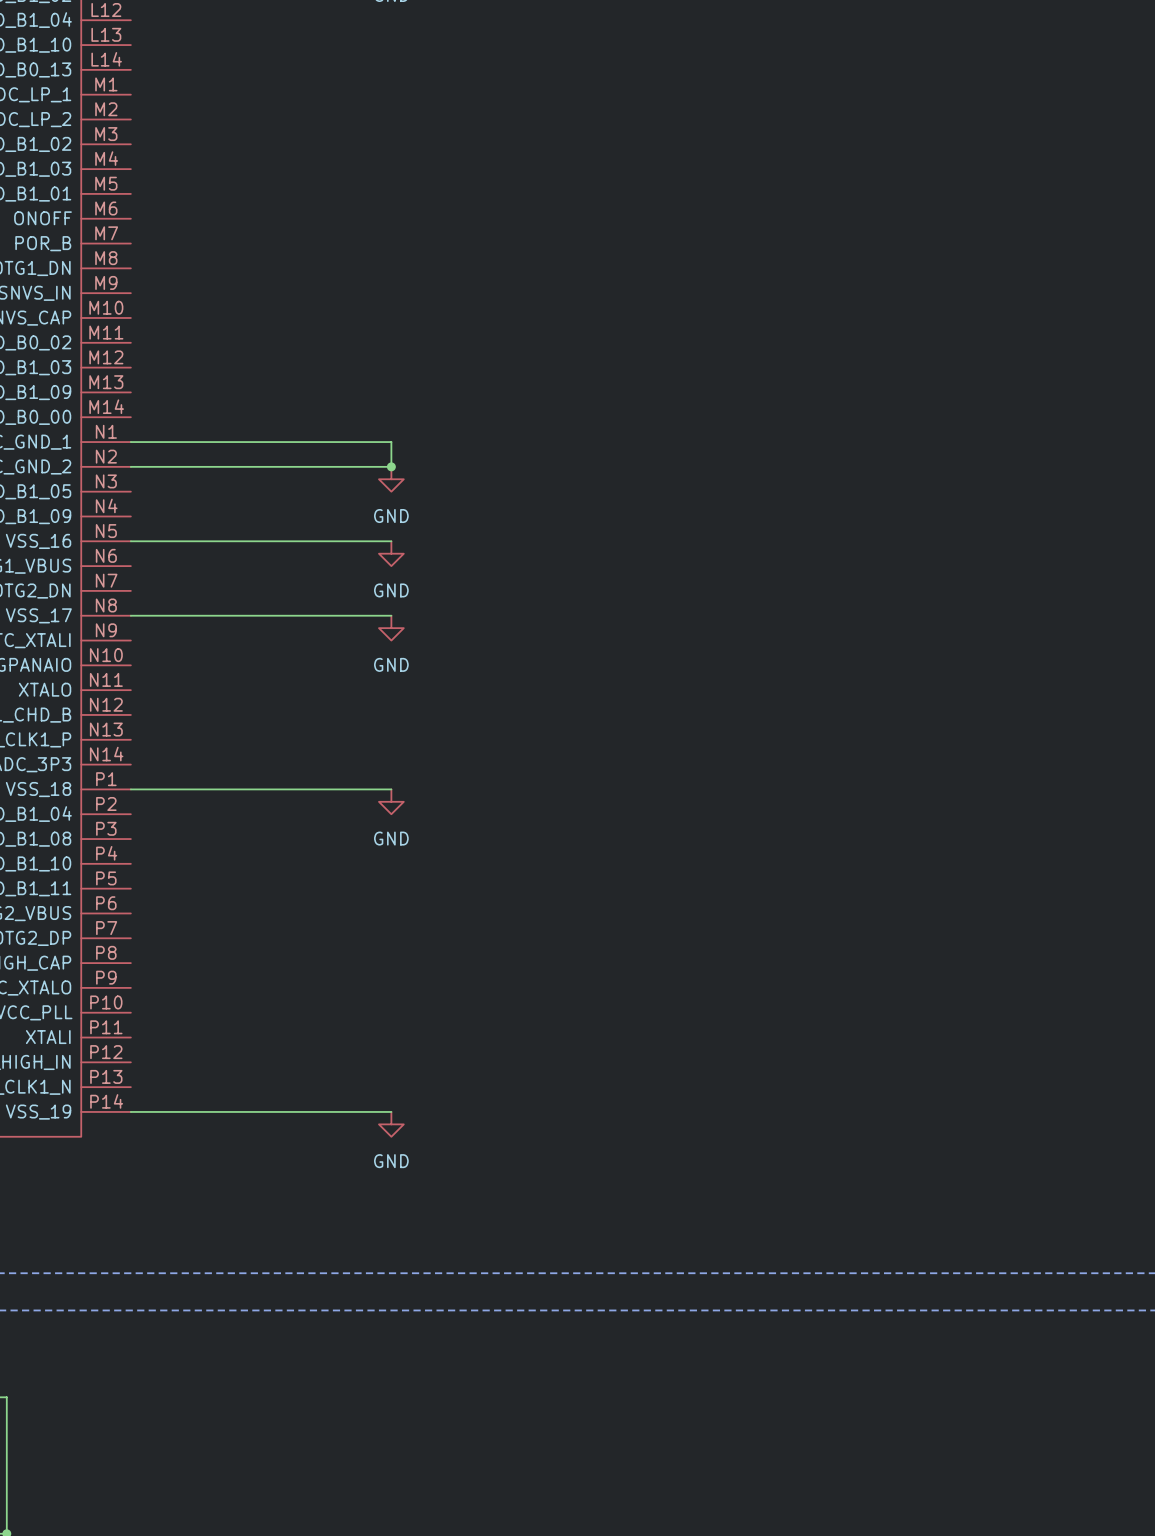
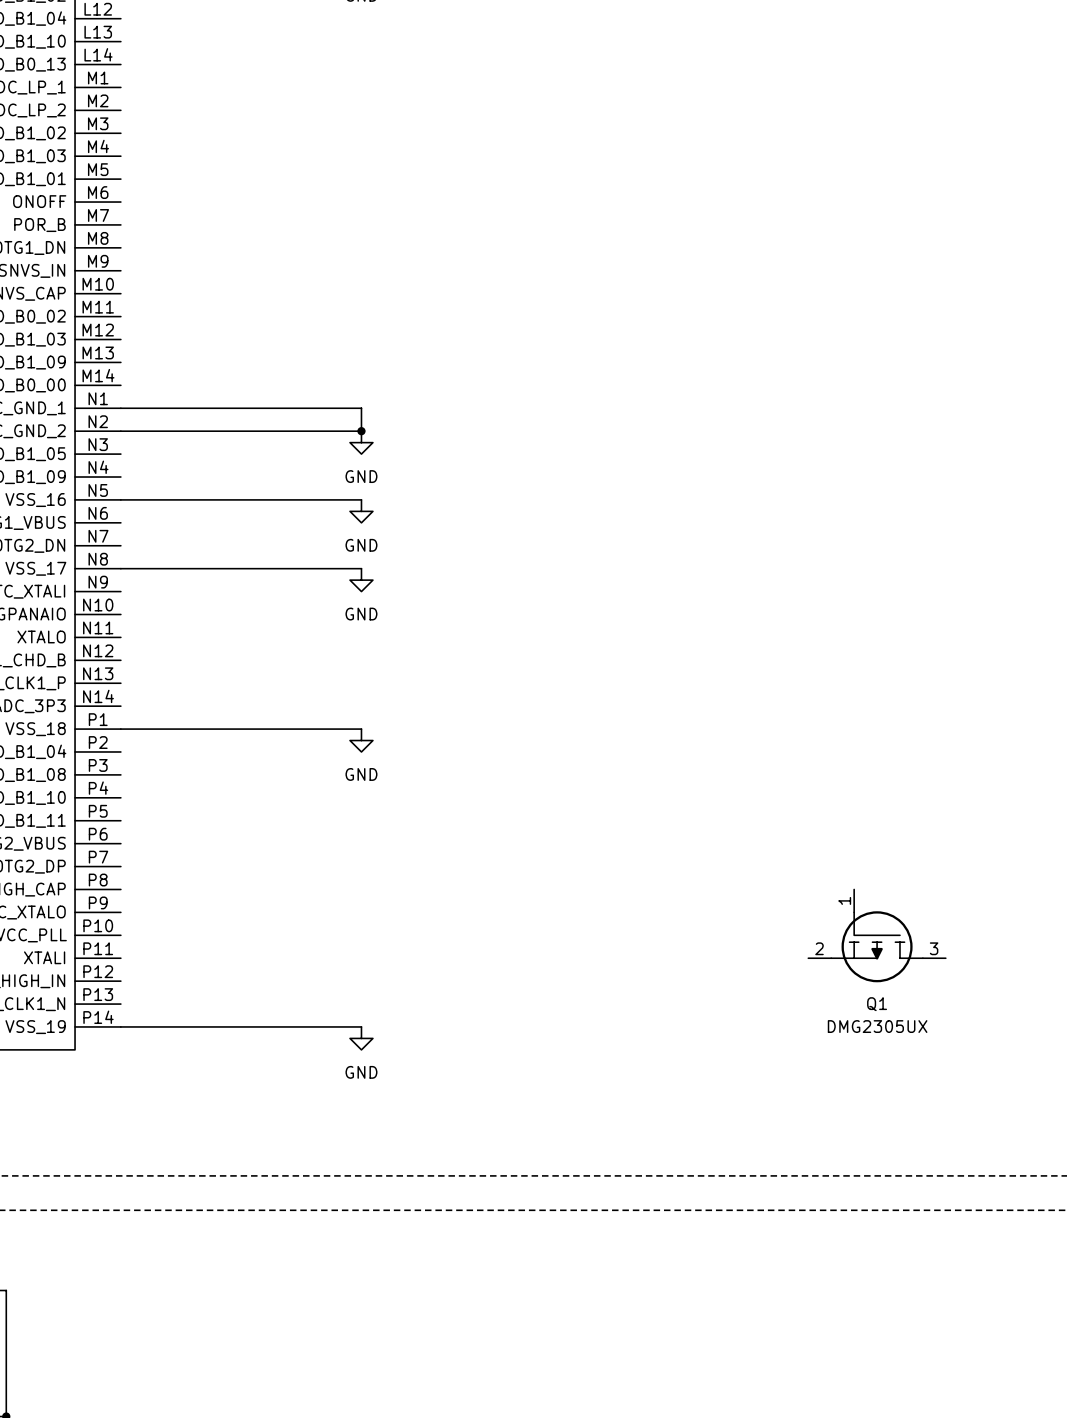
Q1: none -> DMG2305UX (877, 935)

